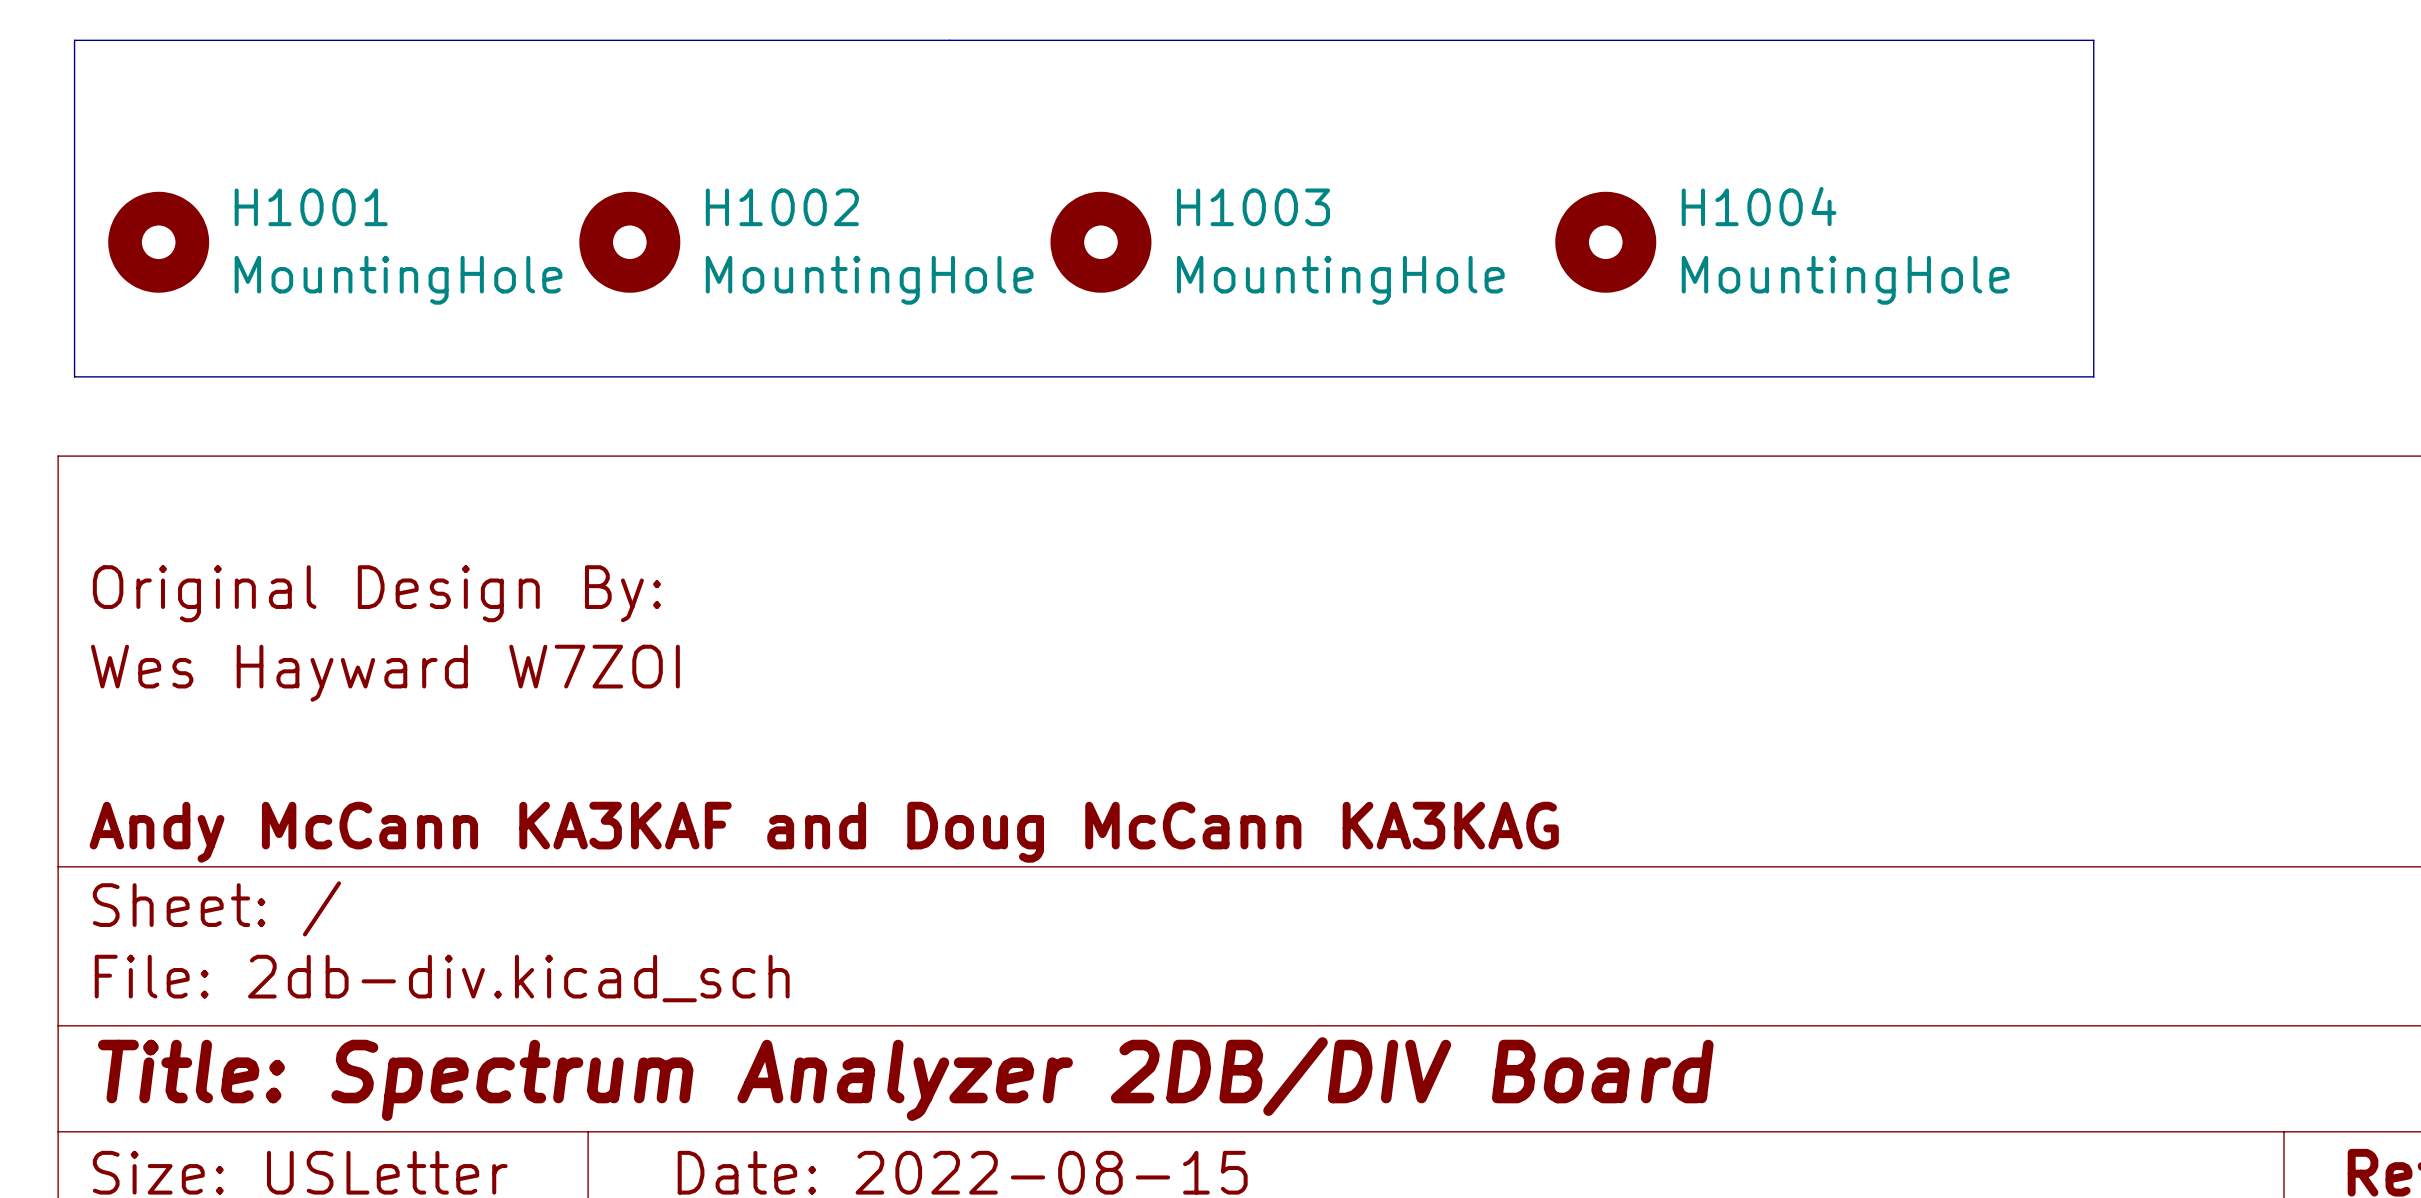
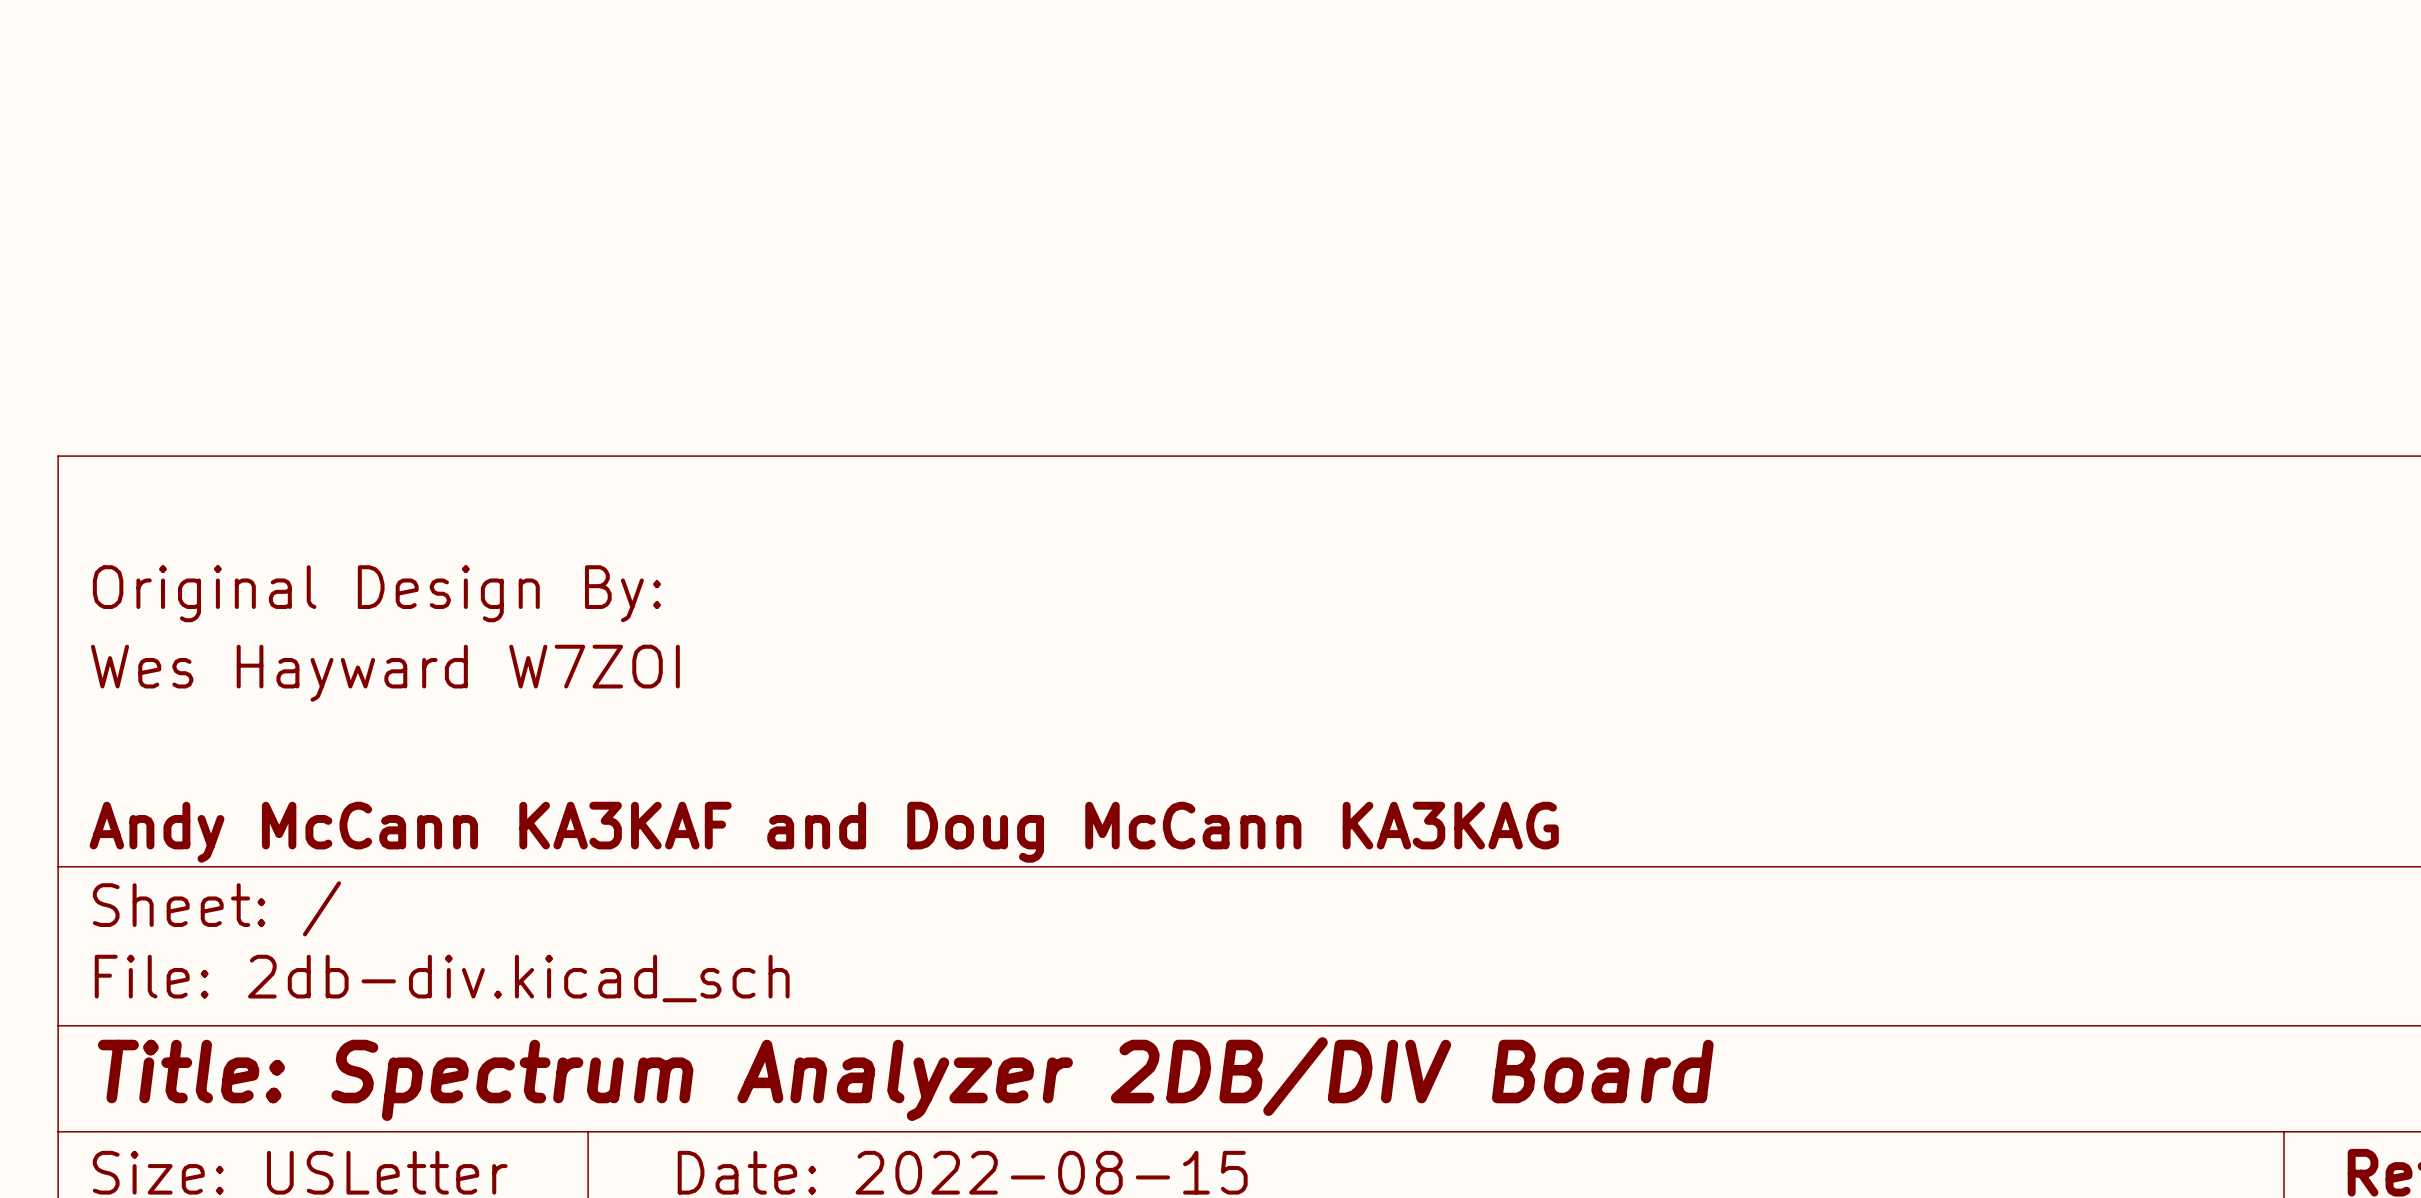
line: (74, 40) (2093, 40) (2093, 376) (74, 376) (74, 40) -> none
H1001: MountingHole (158, 242) -> none
H1002: MountingHole (629, 242) -> none
H1003: MountingHole (1100, 242) -> none
H1004: MountingHole (1605, 242) -> none

